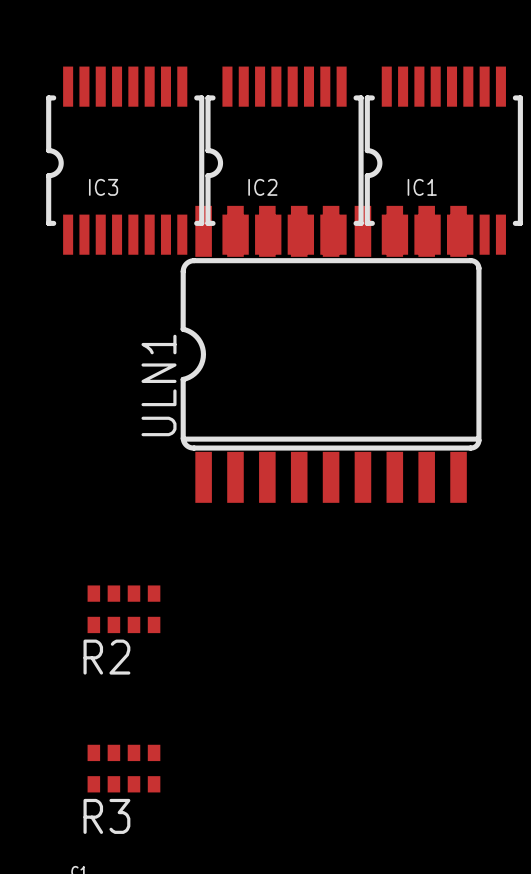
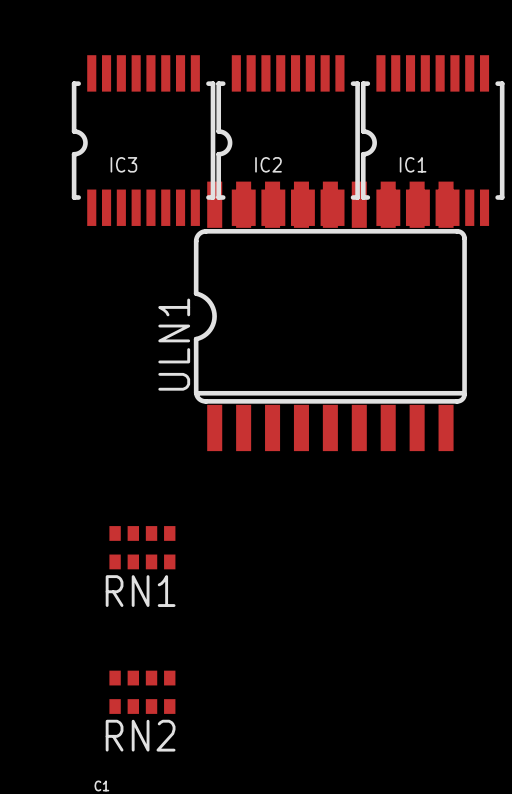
R2 name: R2 (106, 657) -> RN1 (140, 591)
R3 name: R3 (106, 816) -> RN2 (140, 735)

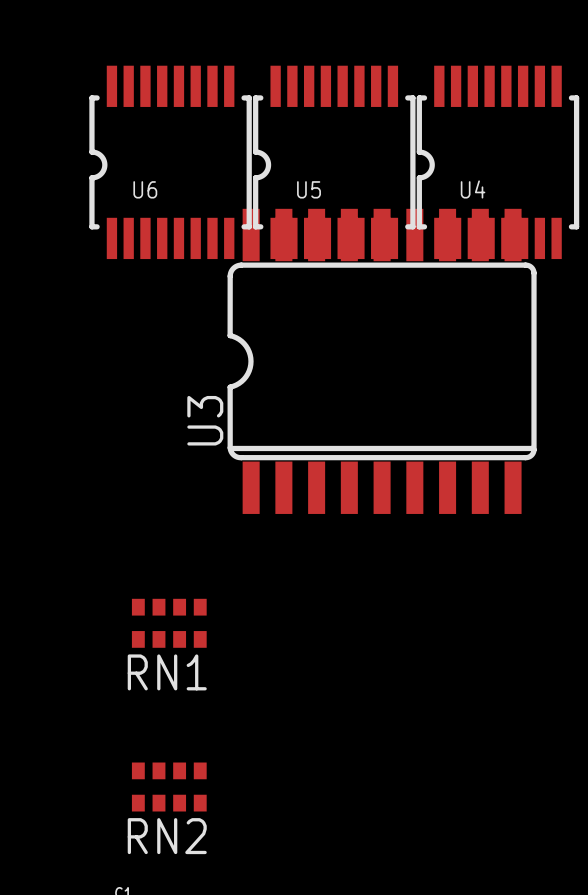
IC3 name: IC3 (123, 164) -> U6 (145, 189)
IC2 name: IC2 (268, 164) -> U5 (309, 189)
IC1 name: IC1 (413, 164) -> U4 (473, 189)
ULN1 name: ULN1 (174, 344) -> U3 (205, 420)

